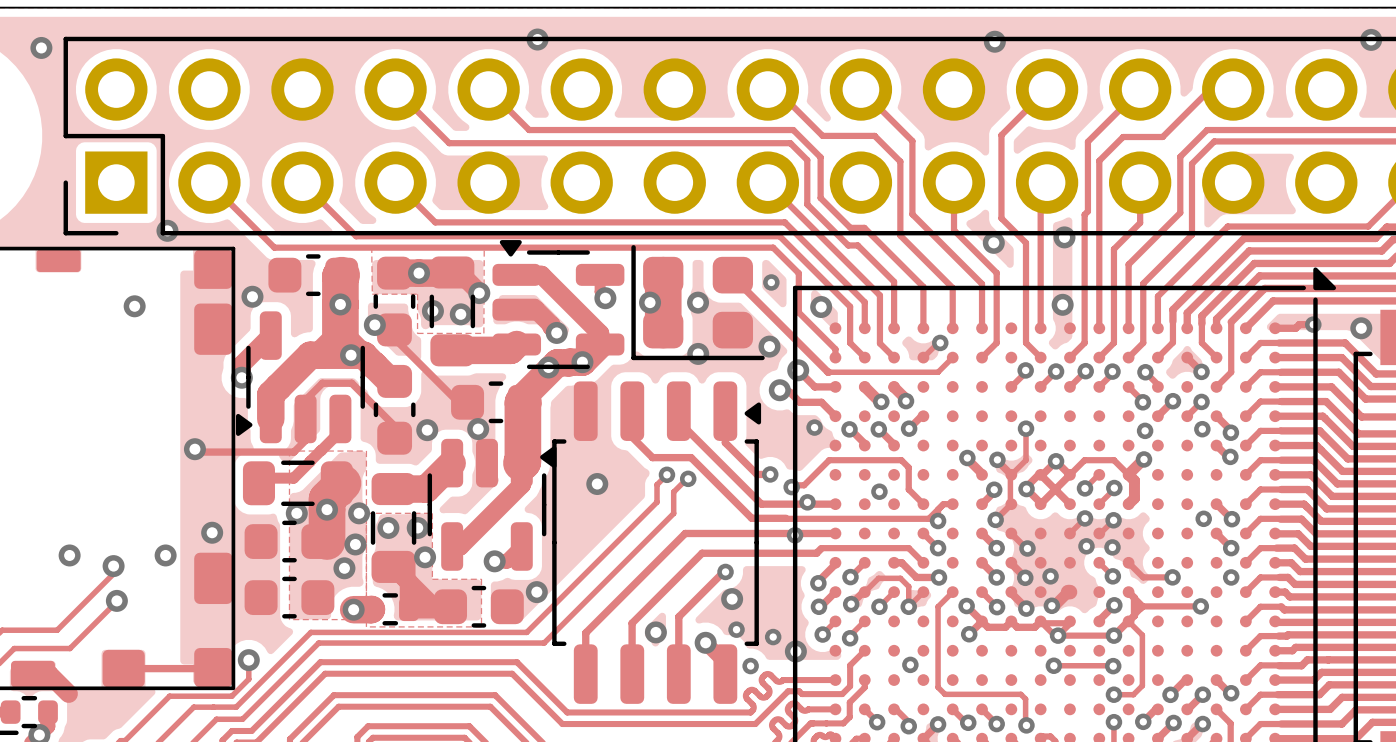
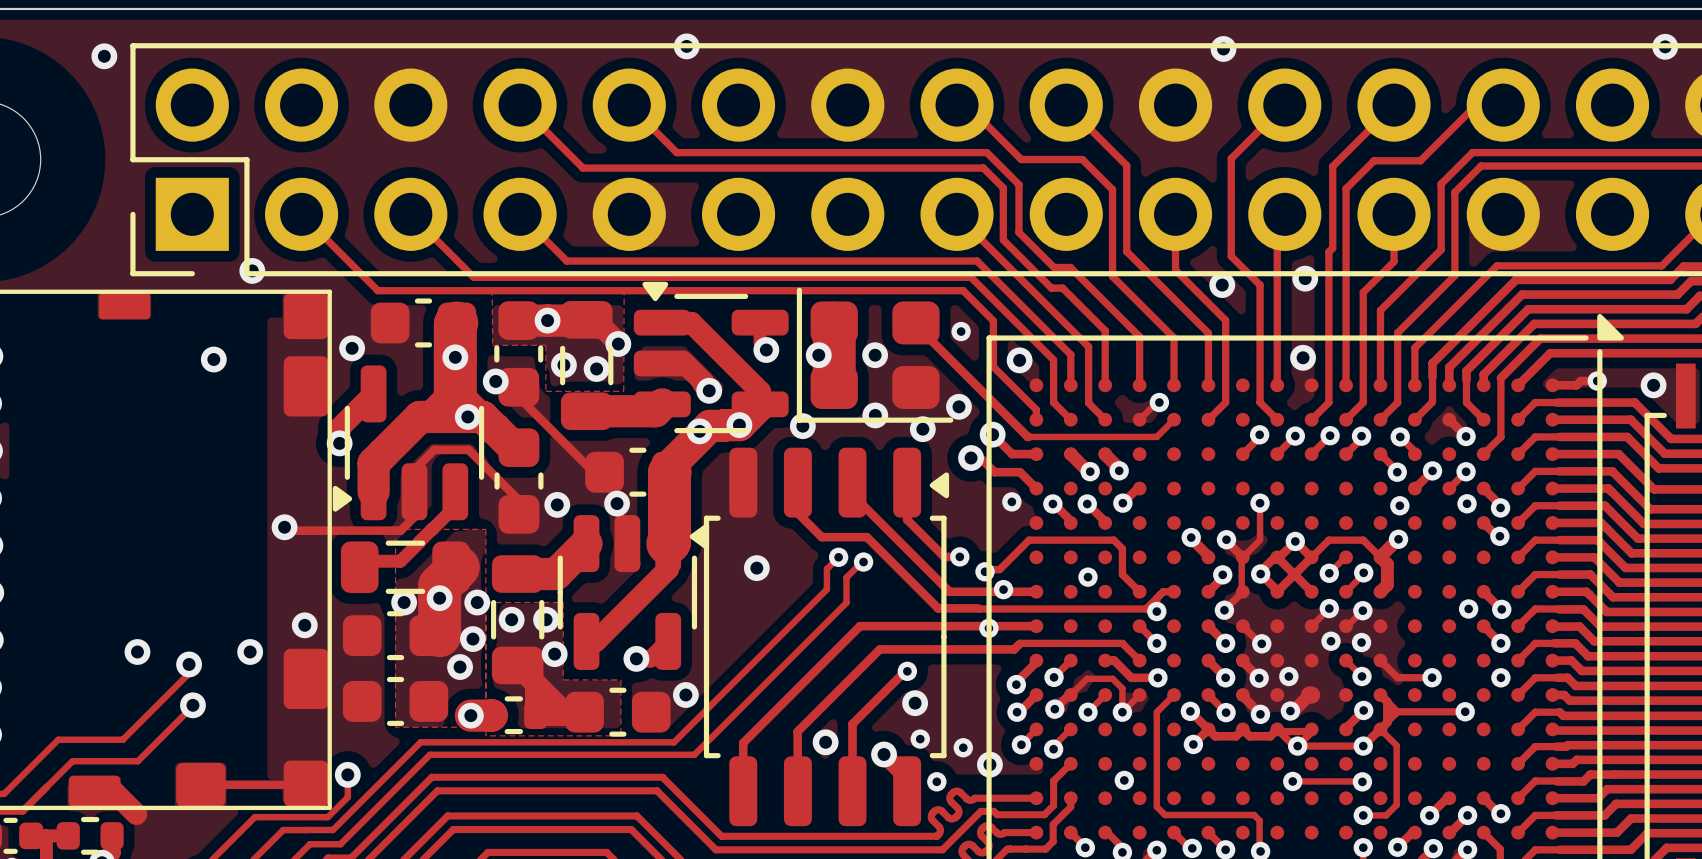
via: none -> (802, 426)
via: none -> (922, 429)

